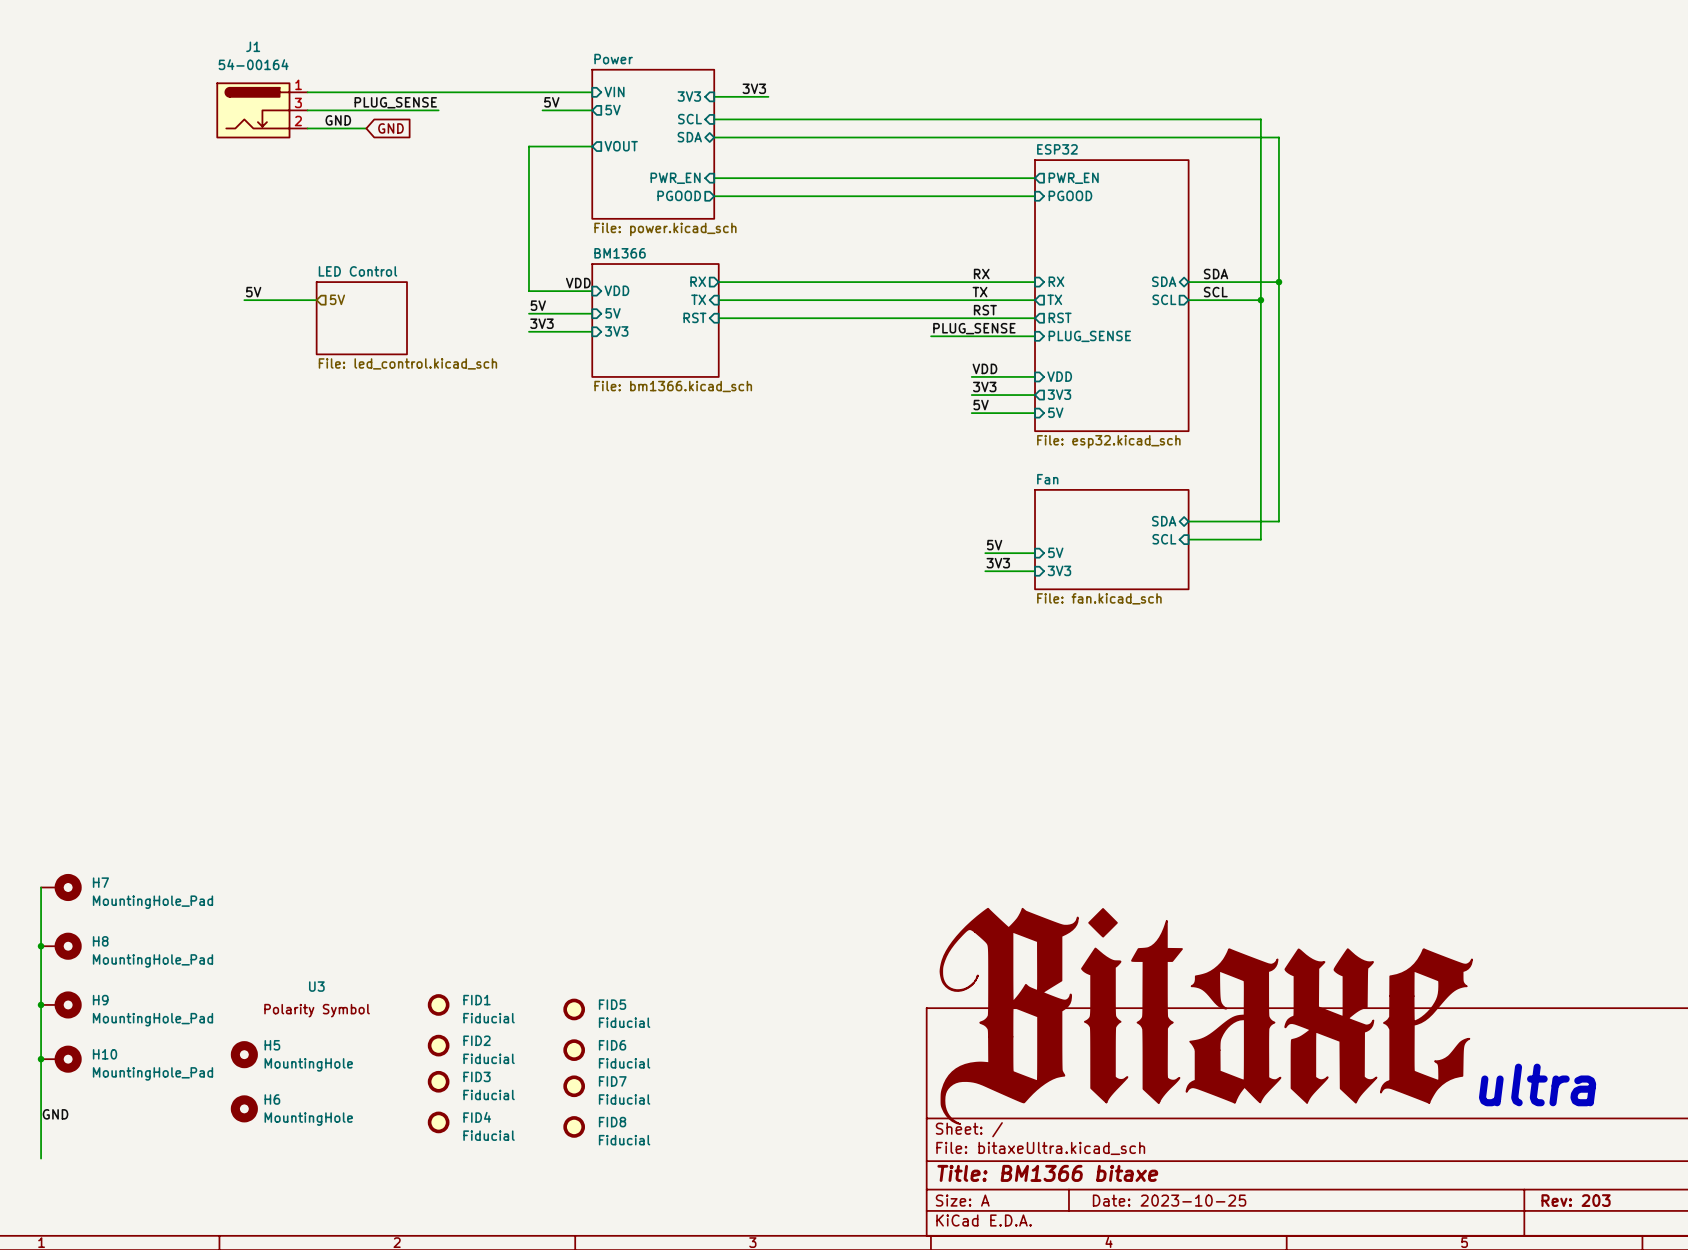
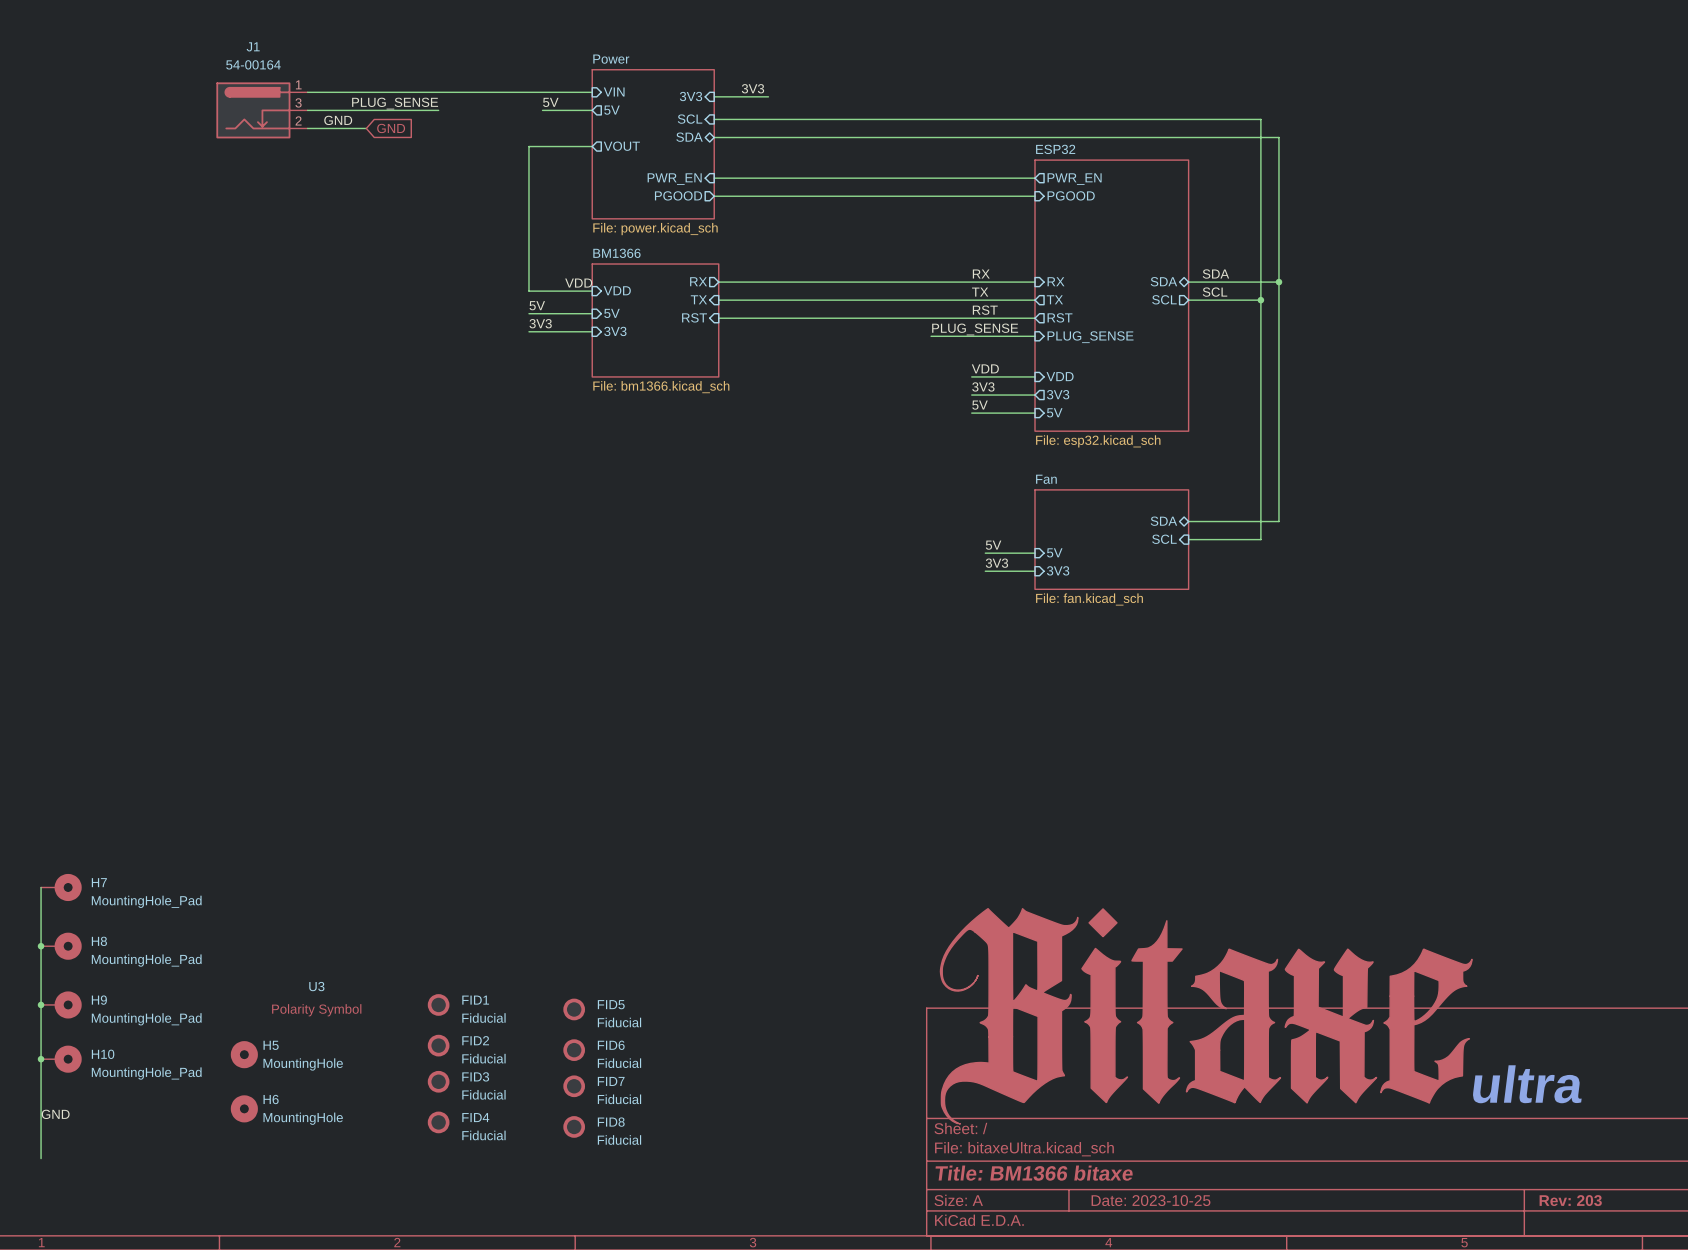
label: 5V (253, 292) -> none
hierarchical label: 5V (337, 299) -> none
wire: (244, 300) (316, 300) -> none
sheet LED Control: File: led_control.kicad_sch (361, 318) -> none

